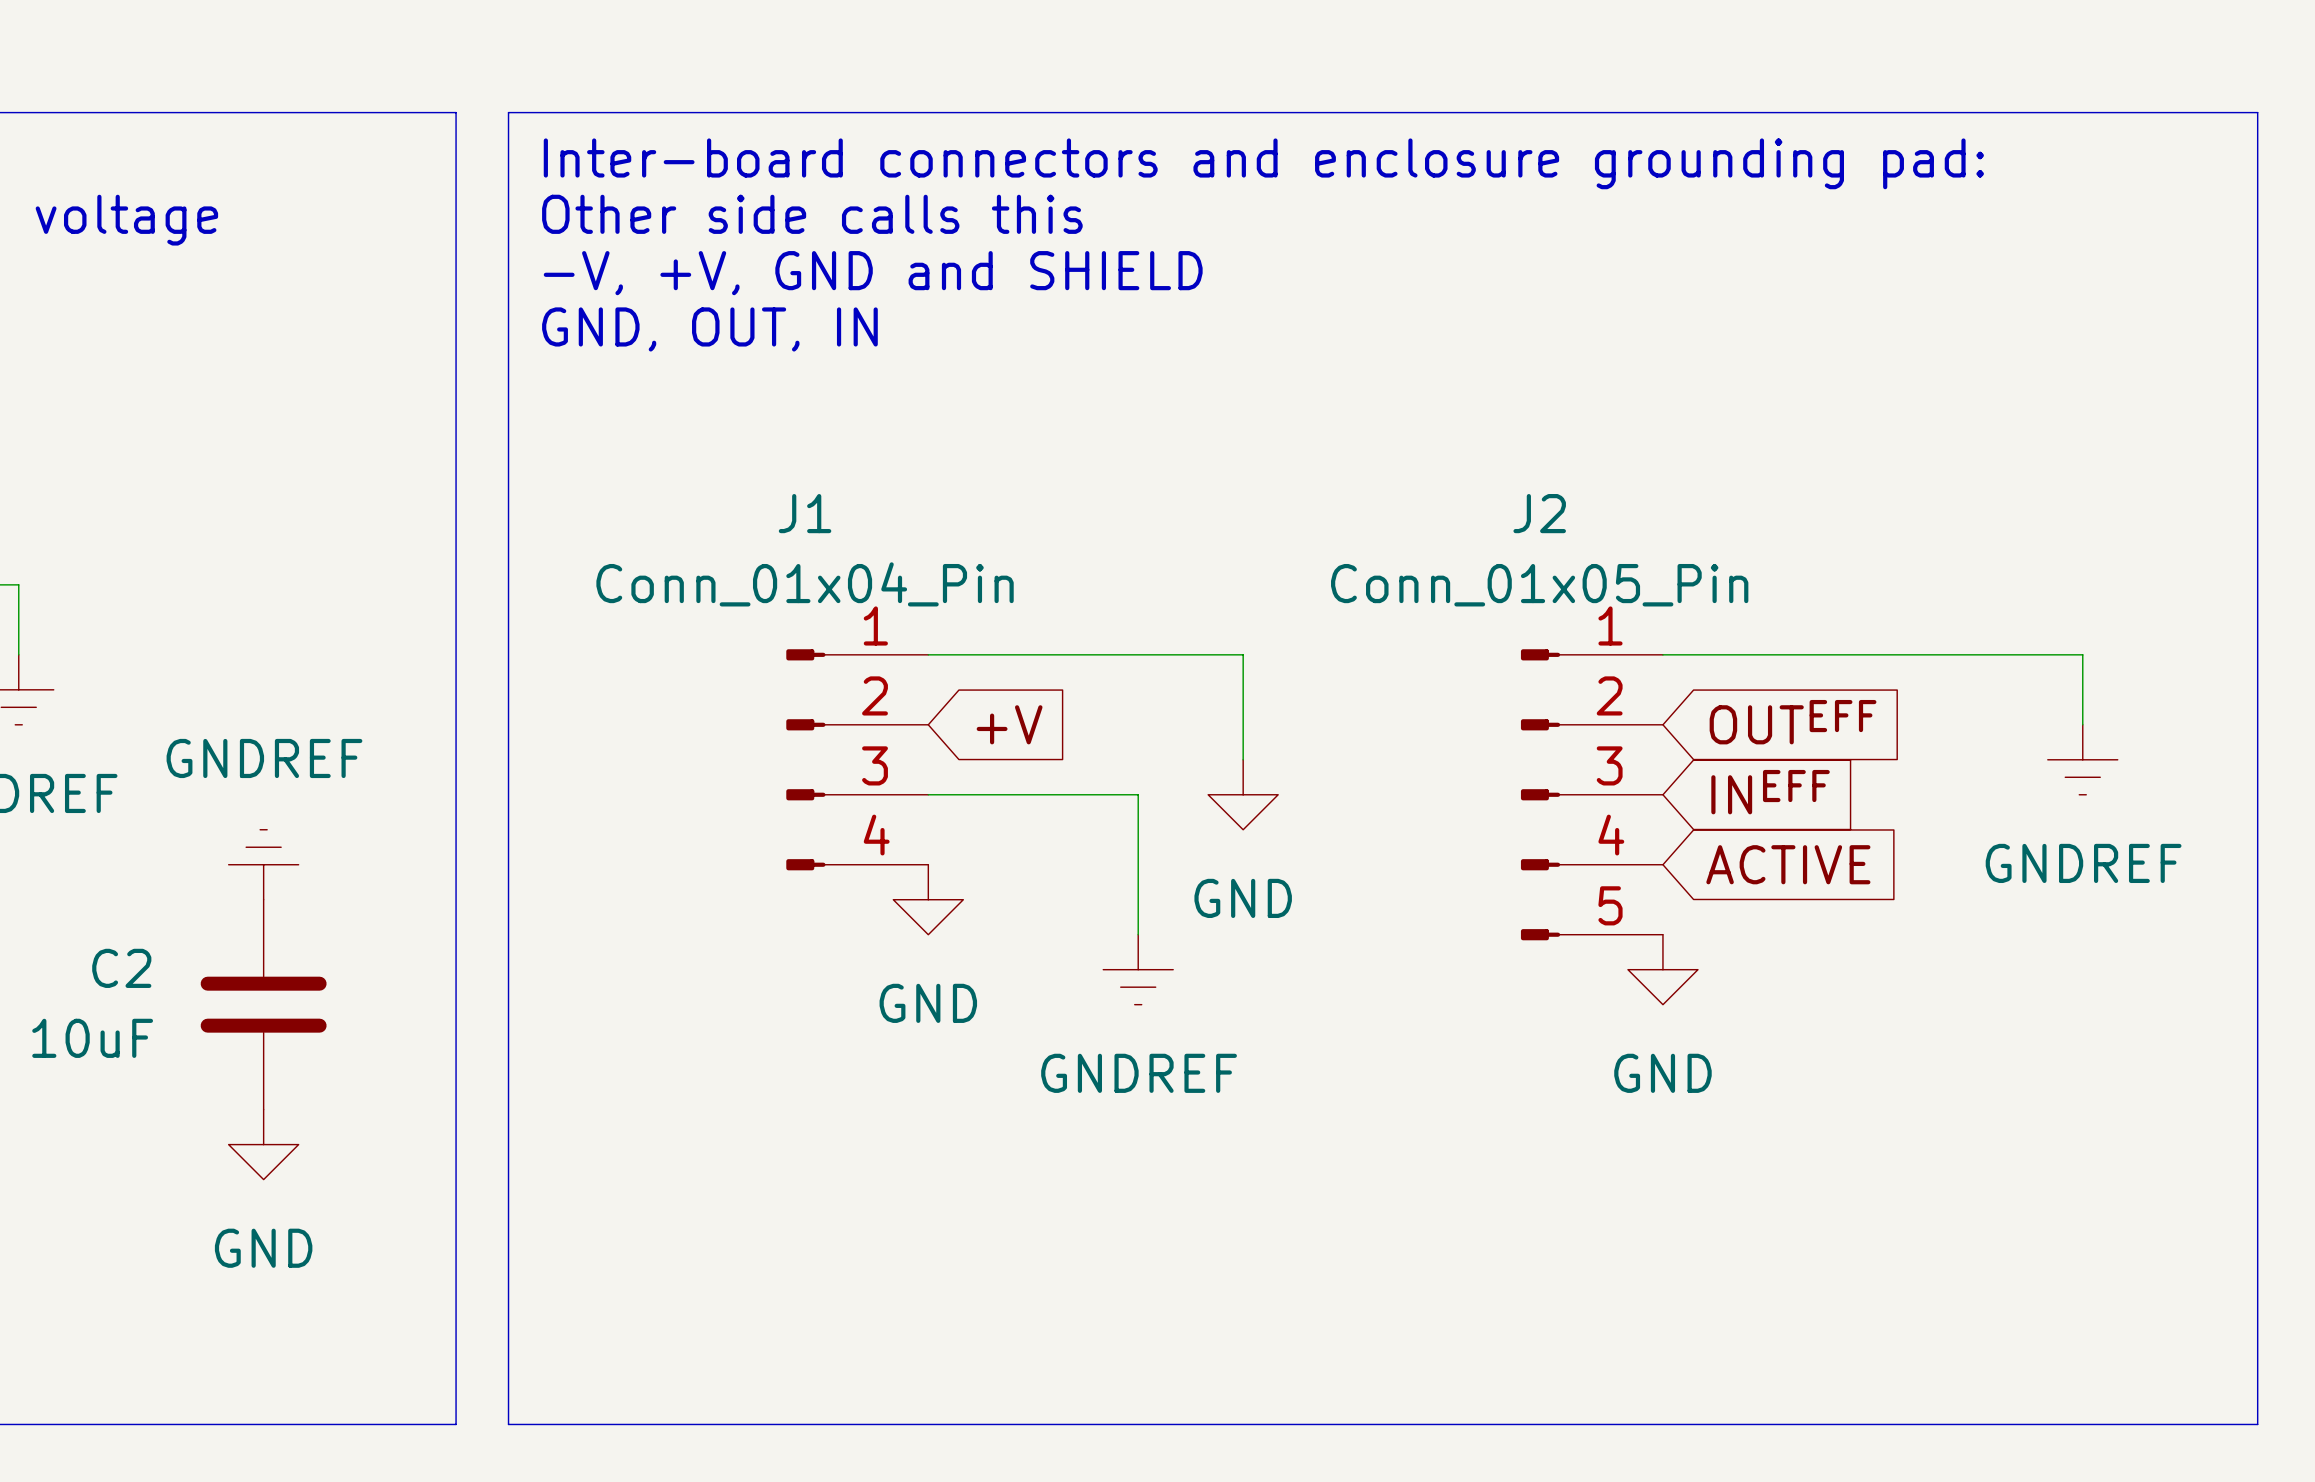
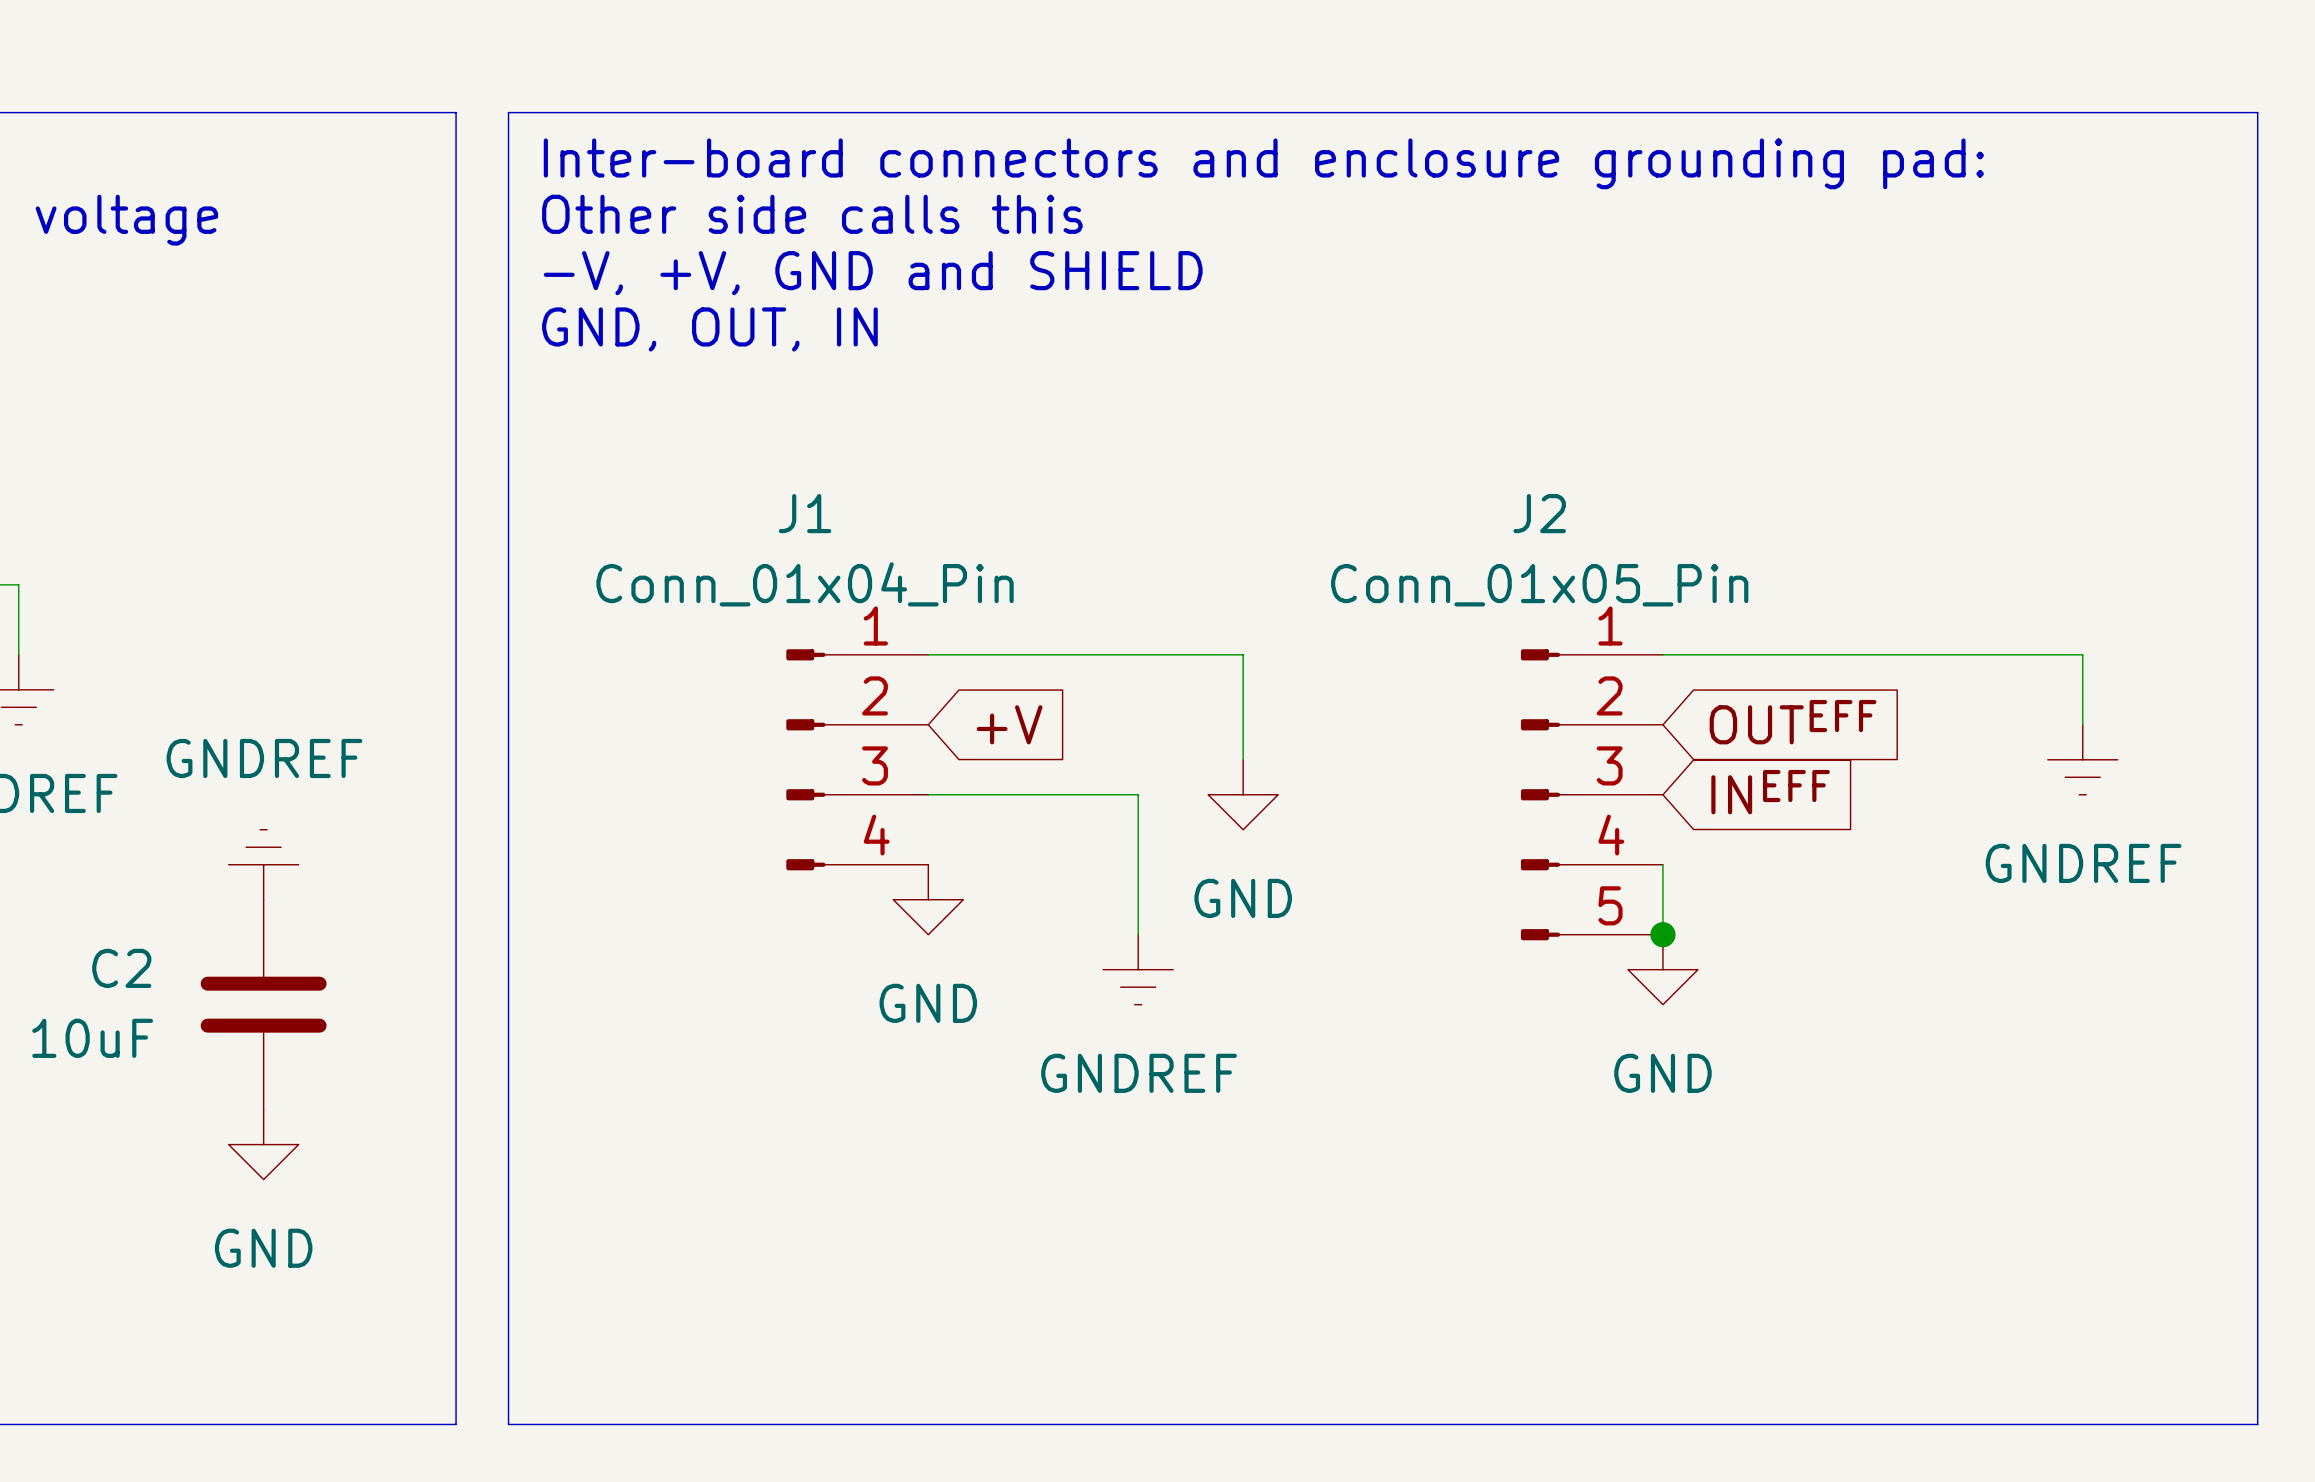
wire: none -> (1662, 864) (1662, 934)
global label: ACTIVE (1788, 864) -> none
junction: none -> (1662, 934)

